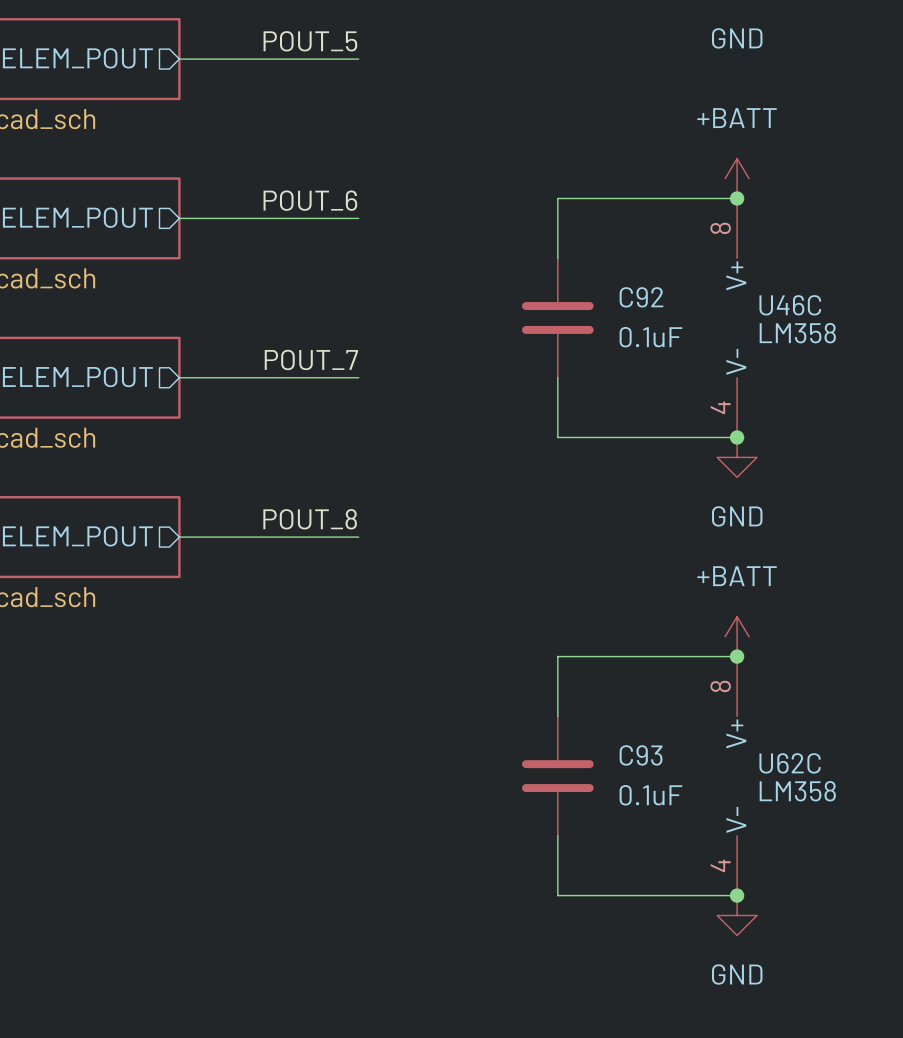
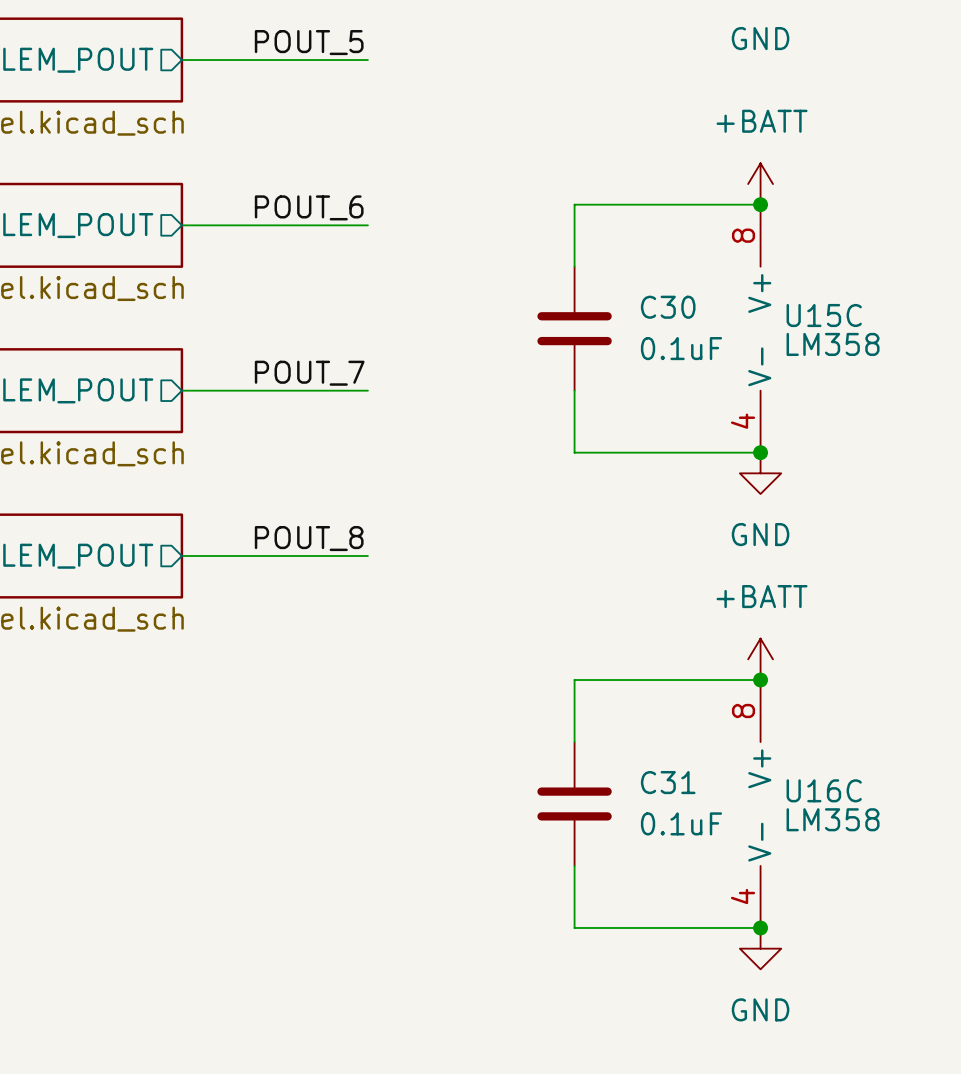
C92 name: C92 (641, 297) -> C30 (668, 307)
U46C name: U46C (790, 305) -> U15C (824, 315)
C93 name: C93 (641, 755) -> C31 (668, 782)
U62C name: U62C (790, 763) -> U16C (824, 790)

